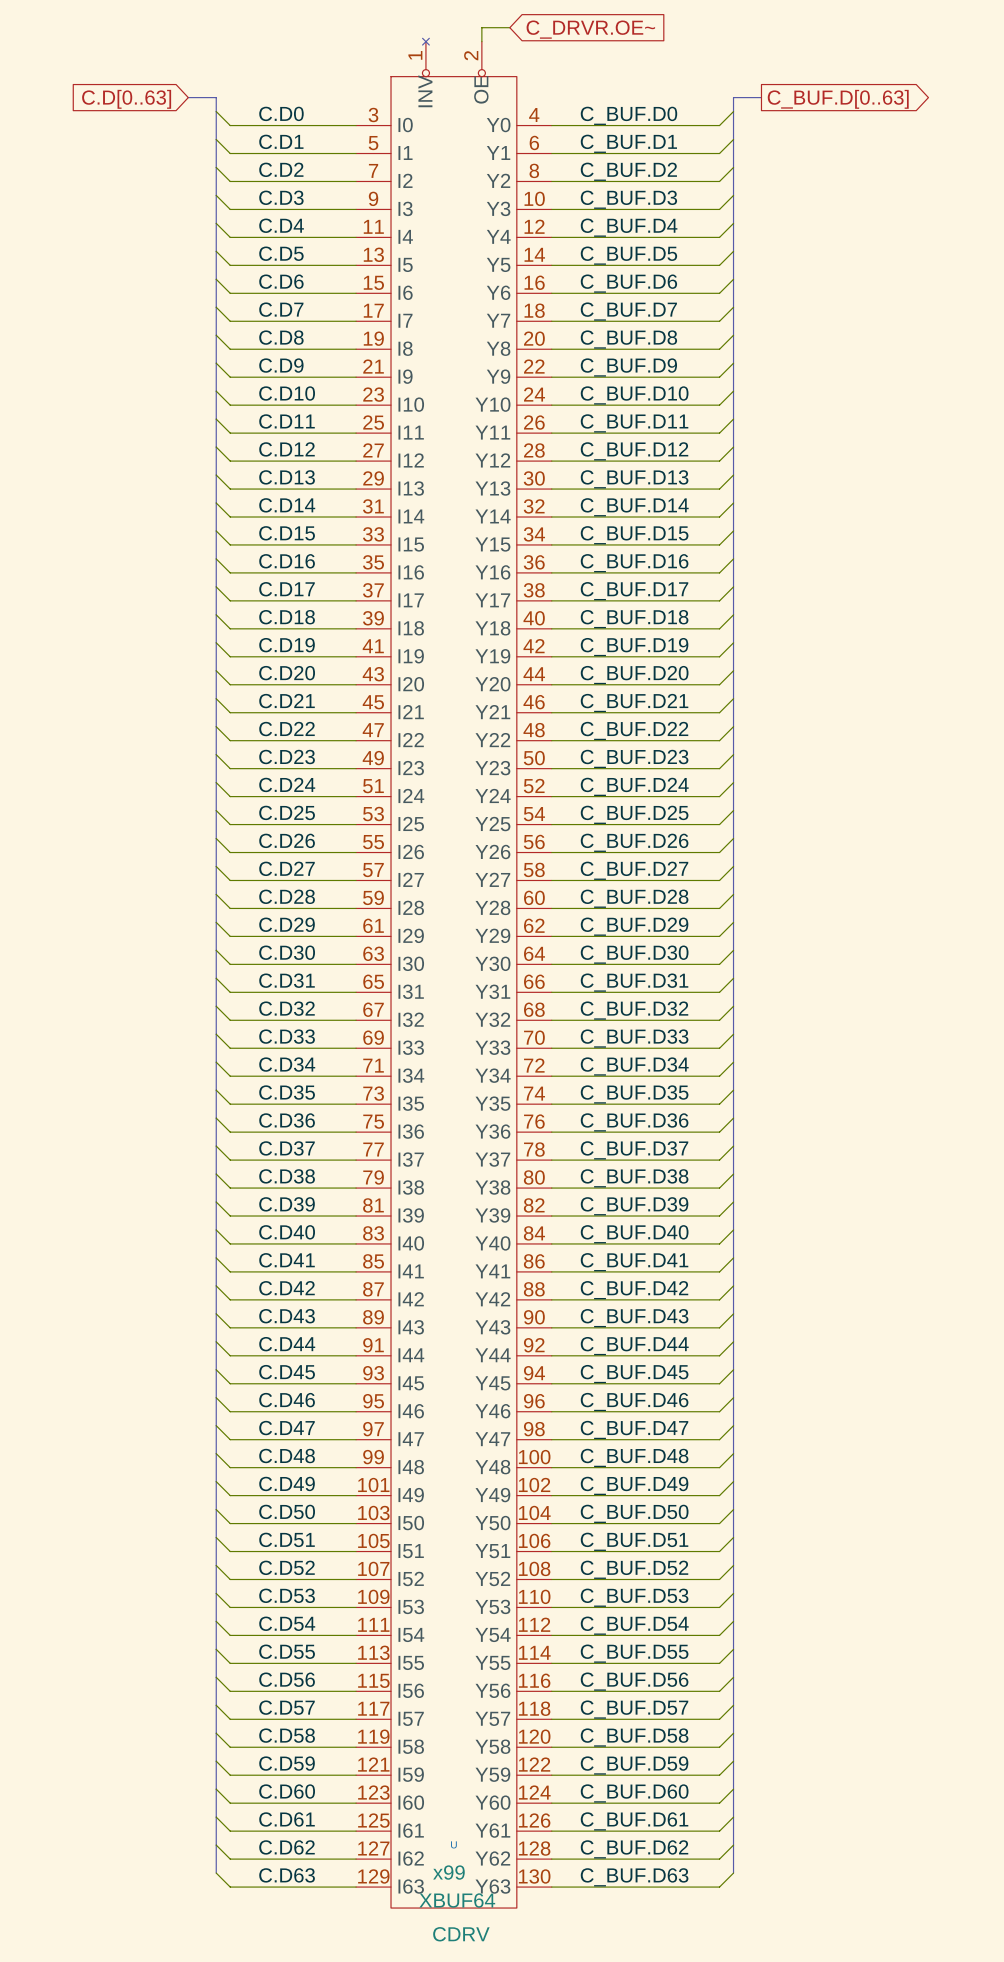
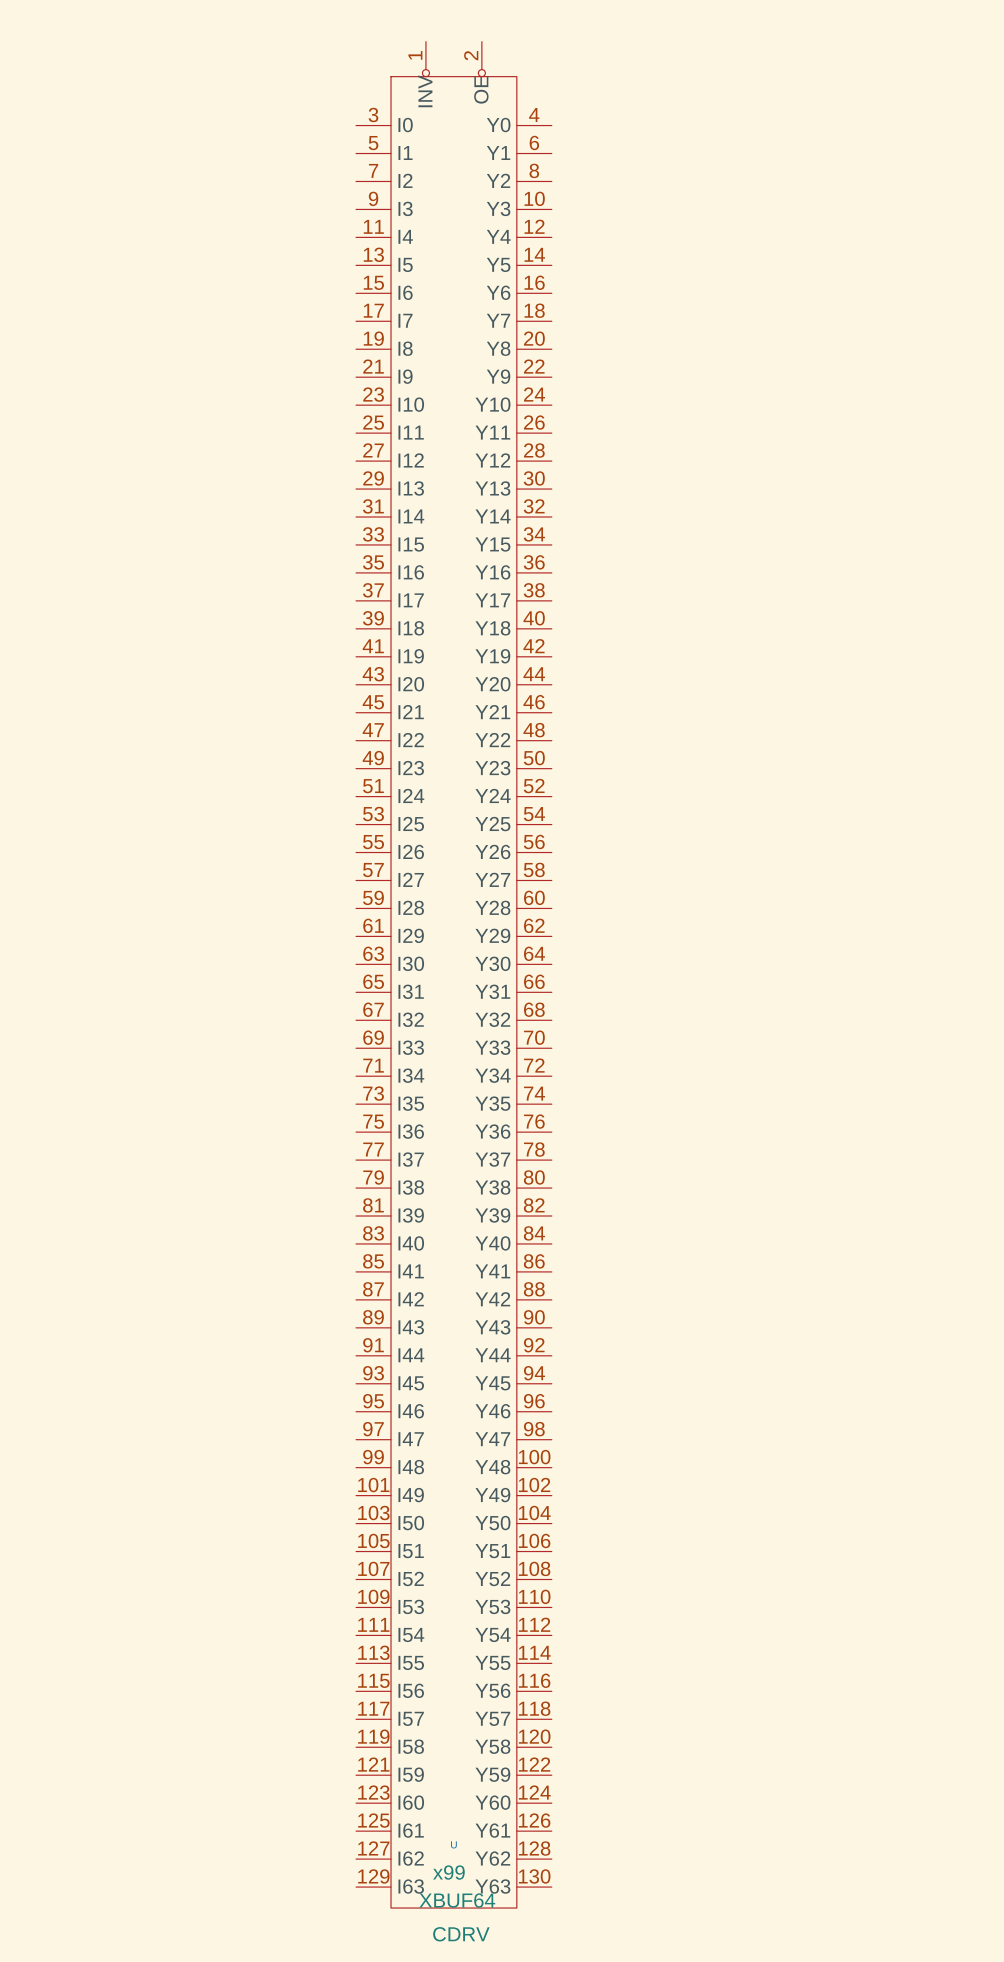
wire: (509, 27) (481, 27) (481, 41) -> none
global label: C_DRVR.OE~ (590, 29) -> none
no-connect mark: (425, 41) -> none
bus: (188, 97) (216, 97) (216, 1873) -> none
bus: (761, 97) (733, 97) (733, 1873) -> none
global label: C.D[0..63] (126, 99) -> none
global label: C_BUF.D[0..63] (838, 99) -> none
wire: (216, 111) (230, 125) (356, 125) -> none
wire: (733, 111) (719, 125) (551, 125) -> none
label: C.D0 (281, 113) -> none
label: C_BUF.D0 (628, 115) -> none
wire: (216, 139) (230, 153) (356, 153) -> none
wire: (733, 139) (719, 153) (551, 153) -> none
label: C.D1 (281, 141) -> none
label: C_BUF.D1 (628, 143) -> none
wire: (216, 167) (230, 181) (356, 181) -> none
wire: (733, 167) (719, 181) (551, 181) -> none
label: C.D2 (281, 169) -> none
label: C_BUF.D2 (628, 171) -> none
wire: (216, 195) (230, 209) (356, 209) -> none
wire: (733, 195) (719, 209) (551, 209) -> none
label: C.D3 (281, 197) -> none
label: C_BUF.D3 (628, 199) -> none
wire: (216, 223) (230, 237) (356, 237) -> none
wire: (733, 223) (719, 237) (551, 237) -> none
label: C.D4 (281, 225) -> none
label: C_BUF.D4 (629, 227) -> none
wire: (216, 251) (230, 265) (356, 265) -> none
wire: (733, 251) (719, 265) (551, 265) -> none
label: C.D5 (281, 253) -> none
label: C_BUF.D5 (628, 255) -> none
wire: (216, 279) (230, 293) (356, 293) -> none
wire: (733, 279) (719, 293) (551, 293) -> none
label: C.D6 (281, 281) -> none
label: C_BUF.D6 (628, 283) -> none
wire: (216, 307) (230, 321) (356, 321) -> none
wire: (733, 307) (719, 321) (551, 321) -> none
label: C.D7 (281, 309) -> none
label: C_BUF.D7 (628, 311) -> none
wire: (216, 335) (230, 349) (356, 349) -> none
wire: (733, 335) (719, 349) (551, 349) -> none
label: C.D8 (281, 337) -> none
label: C_BUF.D8 (628, 339) -> none
wire: (216, 363) (230, 377) (356, 377) -> none
wire: (733, 363) (719, 377) (551, 377) -> none
label: C.D9 (281, 365) -> none
label: C_BUF.D9 (628, 367) -> none
wire: (216, 391) (230, 405) (356, 405) -> none
wire: (733, 391) (719, 405) (551, 405) -> none
label: C.D10 (287, 393) -> none
label: C_BUF.D10 (634, 395) -> none
wire: (216, 419) (230, 433) (356, 433) -> none
wire: (733, 419) (719, 433) (551, 433) -> none
label: C.D11 (287, 421) -> none
label: C_BUF.D11 (634, 423) -> none
wire: (216, 447) (230, 461) (356, 461) -> none
wire: (733, 447) (719, 461) (551, 461) -> none
label: C.D12 (287, 449) -> none
label: C_BUF.D12 (634, 451) -> none
wire: (216, 475) (230, 489) (356, 489) -> none
wire: (733, 475) (719, 489) (551, 489) -> none
label: C.D13 (287, 477) -> none
label: C_BUF.D13 (634, 479) -> none
wire: (216, 503) (230, 517) (356, 517) -> none
wire: (733, 503) (719, 517) (551, 517) -> none
label: C.D14 (287, 505) -> none
label: C_BUF.D14 (634, 507) -> none
wire: (216, 530) (230, 544) (356, 544) -> none
wire: (733, 530) (719, 544) (551, 544) -> none
label: C.D15 (287, 533) -> none
label: C_BUF.D15 (634, 535) -> none
wire: (216, 558) (230, 572) (356, 572) -> none
wire: (733, 558) (719, 572) (551, 572) -> none
label: C.D16 (287, 561) -> none
label: C_BUF.D16 (634, 563) -> none
wire: (216, 586) (230, 600) (356, 600) -> none
wire: (733, 586) (719, 600) (551, 600) -> none
label: C.D17 (287, 589) -> none
label: C_BUF.D17 (634, 591) -> none
wire: (216, 614) (230, 628) (356, 628) -> none
wire: (733, 614) (719, 628) (551, 628) -> none
label: C.D18 (287, 617) -> none
label: C_BUF.D18 (634, 619) -> none
wire: (216, 642) (230, 656) (356, 656) -> none
wire: (733, 642) (719, 656) (551, 656) -> none
label: C.D19 (287, 645) -> none
label: C_BUF.D19 (634, 647) -> none
wire: (216, 670) (230, 684) (356, 684) -> none
wire: (733, 670) (719, 684) (551, 684) -> none
label: C.D20 (287, 673) -> none
label: C_BUF.D20 (634, 675) -> none
wire: (216, 698) (230, 712) (356, 712) -> none
wire: (733, 698) (719, 712) (551, 712) -> none
label: C.D21 (287, 701) -> none
label: C_BUF.D21 (634, 703) -> none
wire: (216, 726) (230, 740) (356, 740) -> none
wire: (733, 726) (719, 740) (551, 740) -> none
label: C.D22 (287, 729) -> none
label: C_BUF.D22 (634, 730) -> none
wire: (216, 754) (230, 768) (356, 768) -> none
wire: (733, 754) (719, 768) (551, 768) -> none
label: C.D23 (287, 757) -> none
label: C_BUF.D23 (634, 758) -> none
wire: (216, 782) (230, 796) (356, 796) -> none
wire: (733, 782) (719, 796) (551, 796) -> none
label: C.D24 (287, 784) -> none
label: C_BUF.D24 (634, 786) -> none
wire: (216, 810) (230, 824) (356, 824) -> none
wire: (733, 810) (719, 824) (551, 824) -> none
label: C.D25 (287, 812) -> none
label: C_BUF.D25 (634, 814) -> none
wire: (216, 838) (230, 852) (356, 852) -> none
wire: (733, 838) (719, 852) (551, 852) -> none
label: C.D26 (287, 840) -> none
label: C_BUF.D26 (634, 842) -> none
wire: (216, 866) (230, 880) (356, 880) -> none
wire: (733, 866) (719, 880) (551, 880) -> none
label: C.D27 (287, 868) -> none
label: C_BUF.D27 (634, 870) -> none
wire: (216, 894) (230, 908) (356, 908) -> none
wire: (733, 894) (719, 908) (551, 908) -> none
label: C.D28 (287, 896) -> none
label: C_BUF.D28 (634, 898) -> none
wire: (216, 922) (230, 936) (356, 936) -> none
wire: (733, 922) (719, 936) (551, 936) -> none
label: C.D29 (287, 924) -> none
label: C_BUF.D29 (634, 926) -> none
wire: (216, 950) (230, 964) (356, 964) -> none
wire: (733, 950) (719, 964) (551, 964) -> none
label: C.D30 (287, 952) -> none
label: C_BUF.D30 (634, 954) -> none
wire: (216, 978) (230, 992) (356, 992) -> none
wire: (733, 978) (719, 992) (551, 992) -> none
label: C.D31 (287, 980) -> none
label: C_BUF.D31 (634, 982) -> none
wire: (216, 1006) (230, 1020) (356, 1020) -> none
wire: (733, 1006) (719, 1020) (551, 1020) -> none
label: C.D32 (287, 1008) -> none
label: C_BUF.D32 (634, 1010) -> none
wire: (216, 1034) (230, 1048) (356, 1048) -> none
wire: (733, 1034) (719, 1048) (551, 1048) -> none
label: C.D33 (287, 1036) -> none
label: C_BUF.D33 (634, 1038) -> none
wire: (216, 1062) (230, 1076) (356, 1076) -> none
wire: (733, 1062) (719, 1076) (551, 1076) -> none
label: C.D34 (287, 1064) -> none
label: C_BUF.D34 (634, 1066) -> none
wire: (216, 1090) (230, 1104) (356, 1104) -> none
wire: (733, 1090) (719, 1104) (551, 1104) -> none
label: C.D35 (287, 1092) -> none
label: C_BUF.D35 (634, 1094) -> none
wire: (216, 1118) (230, 1132) (356, 1132) -> none
wire: (733, 1118) (719, 1132) (551, 1132) -> none
label: C.D36 (287, 1120) -> none
label: C_BUF.D36 (634, 1122) -> none
wire: (216, 1146) (230, 1160) (356, 1160) -> none
wire: (733, 1146) (719, 1160) (551, 1160) -> none
label: C.D37 (287, 1148) -> none
label: C_BUF.D37 (634, 1150) -> none
wire: (216, 1174) (230, 1188) (356, 1188) -> none
wire: (733, 1174) (719, 1188) (551, 1188) -> none
label: C.D38 (287, 1176) -> none
label: C_BUF.D38 (634, 1178) -> none
wire: (216, 1202) (230, 1216) (356, 1216) -> none
wire: (733, 1202) (719, 1216) (551, 1216) -> none
label: C.D39 (287, 1204) -> none
label: C_BUF.D39 (634, 1206) -> none
wire: (216, 1229) (230, 1243) (356, 1243) -> none
wire: (733, 1229) (719, 1243) (551, 1243) -> none
label: C.D40 (287, 1232) -> none
label: C_BUF.D40 (634, 1234) -> none
wire: (216, 1257) (230, 1271) (356, 1271) -> none
wire: (733, 1257) (719, 1271) (551, 1271) -> none
label: C.D41 (287, 1260) -> none
label: C_BUF.D41 (634, 1262) -> none
wire: (216, 1285) (230, 1299) (356, 1299) -> none
wire: (733, 1285) (719, 1299) (551, 1299) -> none
label: C.D42 (287, 1288) -> none
label: C_BUF.D42 (634, 1290) -> none
wire: (216, 1313) (230, 1327) (356, 1327) -> none
wire: (733, 1313) (719, 1327) (551, 1327) -> none
label: C.D43 (287, 1316) -> none
label: C_BUF.D43 (634, 1318) -> none
wire: (216, 1341) (230, 1355) (356, 1355) -> none
wire: (733, 1341) (719, 1355) (551, 1355) -> none
label: C.D44 (287, 1344) -> none
label: C_BUF.D44 (634, 1346) -> none
wire: (216, 1369) (230, 1383) (356, 1383) -> none
wire: (733, 1369) (719, 1383) (551, 1383) -> none
label: C.D45 (287, 1372) -> none
label: C_BUF.D45 (634, 1374) -> none
wire: (216, 1397) (230, 1411) (356, 1411) -> none
wire: (733, 1397) (719, 1411) (551, 1411) -> none
label: C.D46 (287, 1400) -> none
label: C_BUF.D46 (634, 1402) -> none
wire: (216, 1425) (230, 1439) (356, 1439) -> none
wire: (733, 1425) (719, 1439) (551, 1439) -> none
label: C.D47 (287, 1428) -> none
label: C_BUF.D47 (634, 1429) -> none
wire: (216, 1453) (230, 1467) (356, 1467) -> none
wire: (733, 1453) (719, 1467) (551, 1467) -> none
label: C.D48 (287, 1456) -> none
label: C_BUF.D48 (634, 1457) -> none
wire: (216, 1481) (230, 1495) (356, 1495) -> none
wire: (733, 1481) (719, 1495) (551, 1495) -> none
label: C.D49 (287, 1483) -> none
label: C_BUF.D49 (634, 1485) -> none
wire: (216, 1509) (230, 1523) (356, 1523) -> none
wire: (733, 1509) (719, 1523) (551, 1523) -> none
label: C.D50 (287, 1511) -> none
label: C_BUF.D50 (634, 1513) -> none
wire: (216, 1537) (230, 1551) (356, 1551) -> none
wire: (733, 1537) (719, 1551) (551, 1551) -> none
label: C.D51 (287, 1539) -> none
label: C_BUF.D51 (634, 1541) -> none
wire: (216, 1565) (230, 1579) (356, 1579) -> none
wire: (733, 1565) (719, 1579) (551, 1579) -> none
label: C.D52 (287, 1567) -> none
label: C_BUF.D52 (634, 1569) -> none
wire: (216, 1593) (230, 1607) (356, 1607) -> none
wire: (733, 1593) (719, 1607) (551, 1607) -> none
label: C.D53 (287, 1595) -> none
label: C_BUF.D53 (634, 1597) -> none
wire: (216, 1621) (230, 1635) (356, 1635) -> none
wire: (733, 1621) (719, 1635) (551, 1635) -> none
label: C.D54 (287, 1623) -> none
label: C_BUF.D54 (634, 1625) -> none
wire: (216, 1649) (230, 1663) (356, 1663) -> none
wire: (733, 1649) (719, 1663) (551, 1663) -> none
label: C.D55 (287, 1651) -> none
label: C_BUF.D55 (634, 1653) -> none
wire: (216, 1677) (230, 1691) (356, 1691) -> none
wire: (733, 1677) (719, 1691) (551, 1691) -> none
label: C.D56 (287, 1679) -> none
label: C_BUF.D56 (634, 1681) -> none
wire: (216, 1705) (230, 1719) (356, 1719) -> none
wire: (733, 1705) (719, 1719) (551, 1719) -> none
label: C.D57 (287, 1707) -> none
label: C_BUF.D57 (634, 1709) -> none
wire: (216, 1733) (230, 1747) (356, 1747) -> none
wire: (733, 1733) (719, 1747) (551, 1747) -> none
label: C.D58 (287, 1735) -> none
label: C_BUF.D58 (634, 1737) -> none
wire: (216, 1761) (230, 1775) (356, 1775) -> none
wire: (733, 1761) (719, 1775) (551, 1775) -> none
label: C.D59 (287, 1763) -> none
label: C_BUF.D59 (634, 1765) -> none
wire: (216, 1789) (230, 1803) (356, 1803) -> none
wire: (733, 1789) (719, 1803) (551, 1803) -> none
label: C.D60 (287, 1791) -> none
label: C_BUF.D60 (634, 1793) -> none
wire: (216, 1817) (230, 1831) (356, 1831) -> none
wire: (733, 1817) (719, 1831) (551, 1831) -> none
label: C.D61 (287, 1819) -> none
label: C_BUF.D61 (634, 1821) -> none
wire: (216, 1845) (230, 1859) (356, 1859) -> none
wire: (733, 1845) (719, 1859) (551, 1859) -> none
label: C.D62 (287, 1847) -> none
label: C_BUF.D62 (634, 1849) -> none
wire: (216, 1873) (230, 1887) (356, 1887) -> none
wire: (733, 1873) (719, 1887) (551, 1887) -> none
label: C.D63 (287, 1875) -> none
label: C_BUF.D63 (634, 1877) -> none

